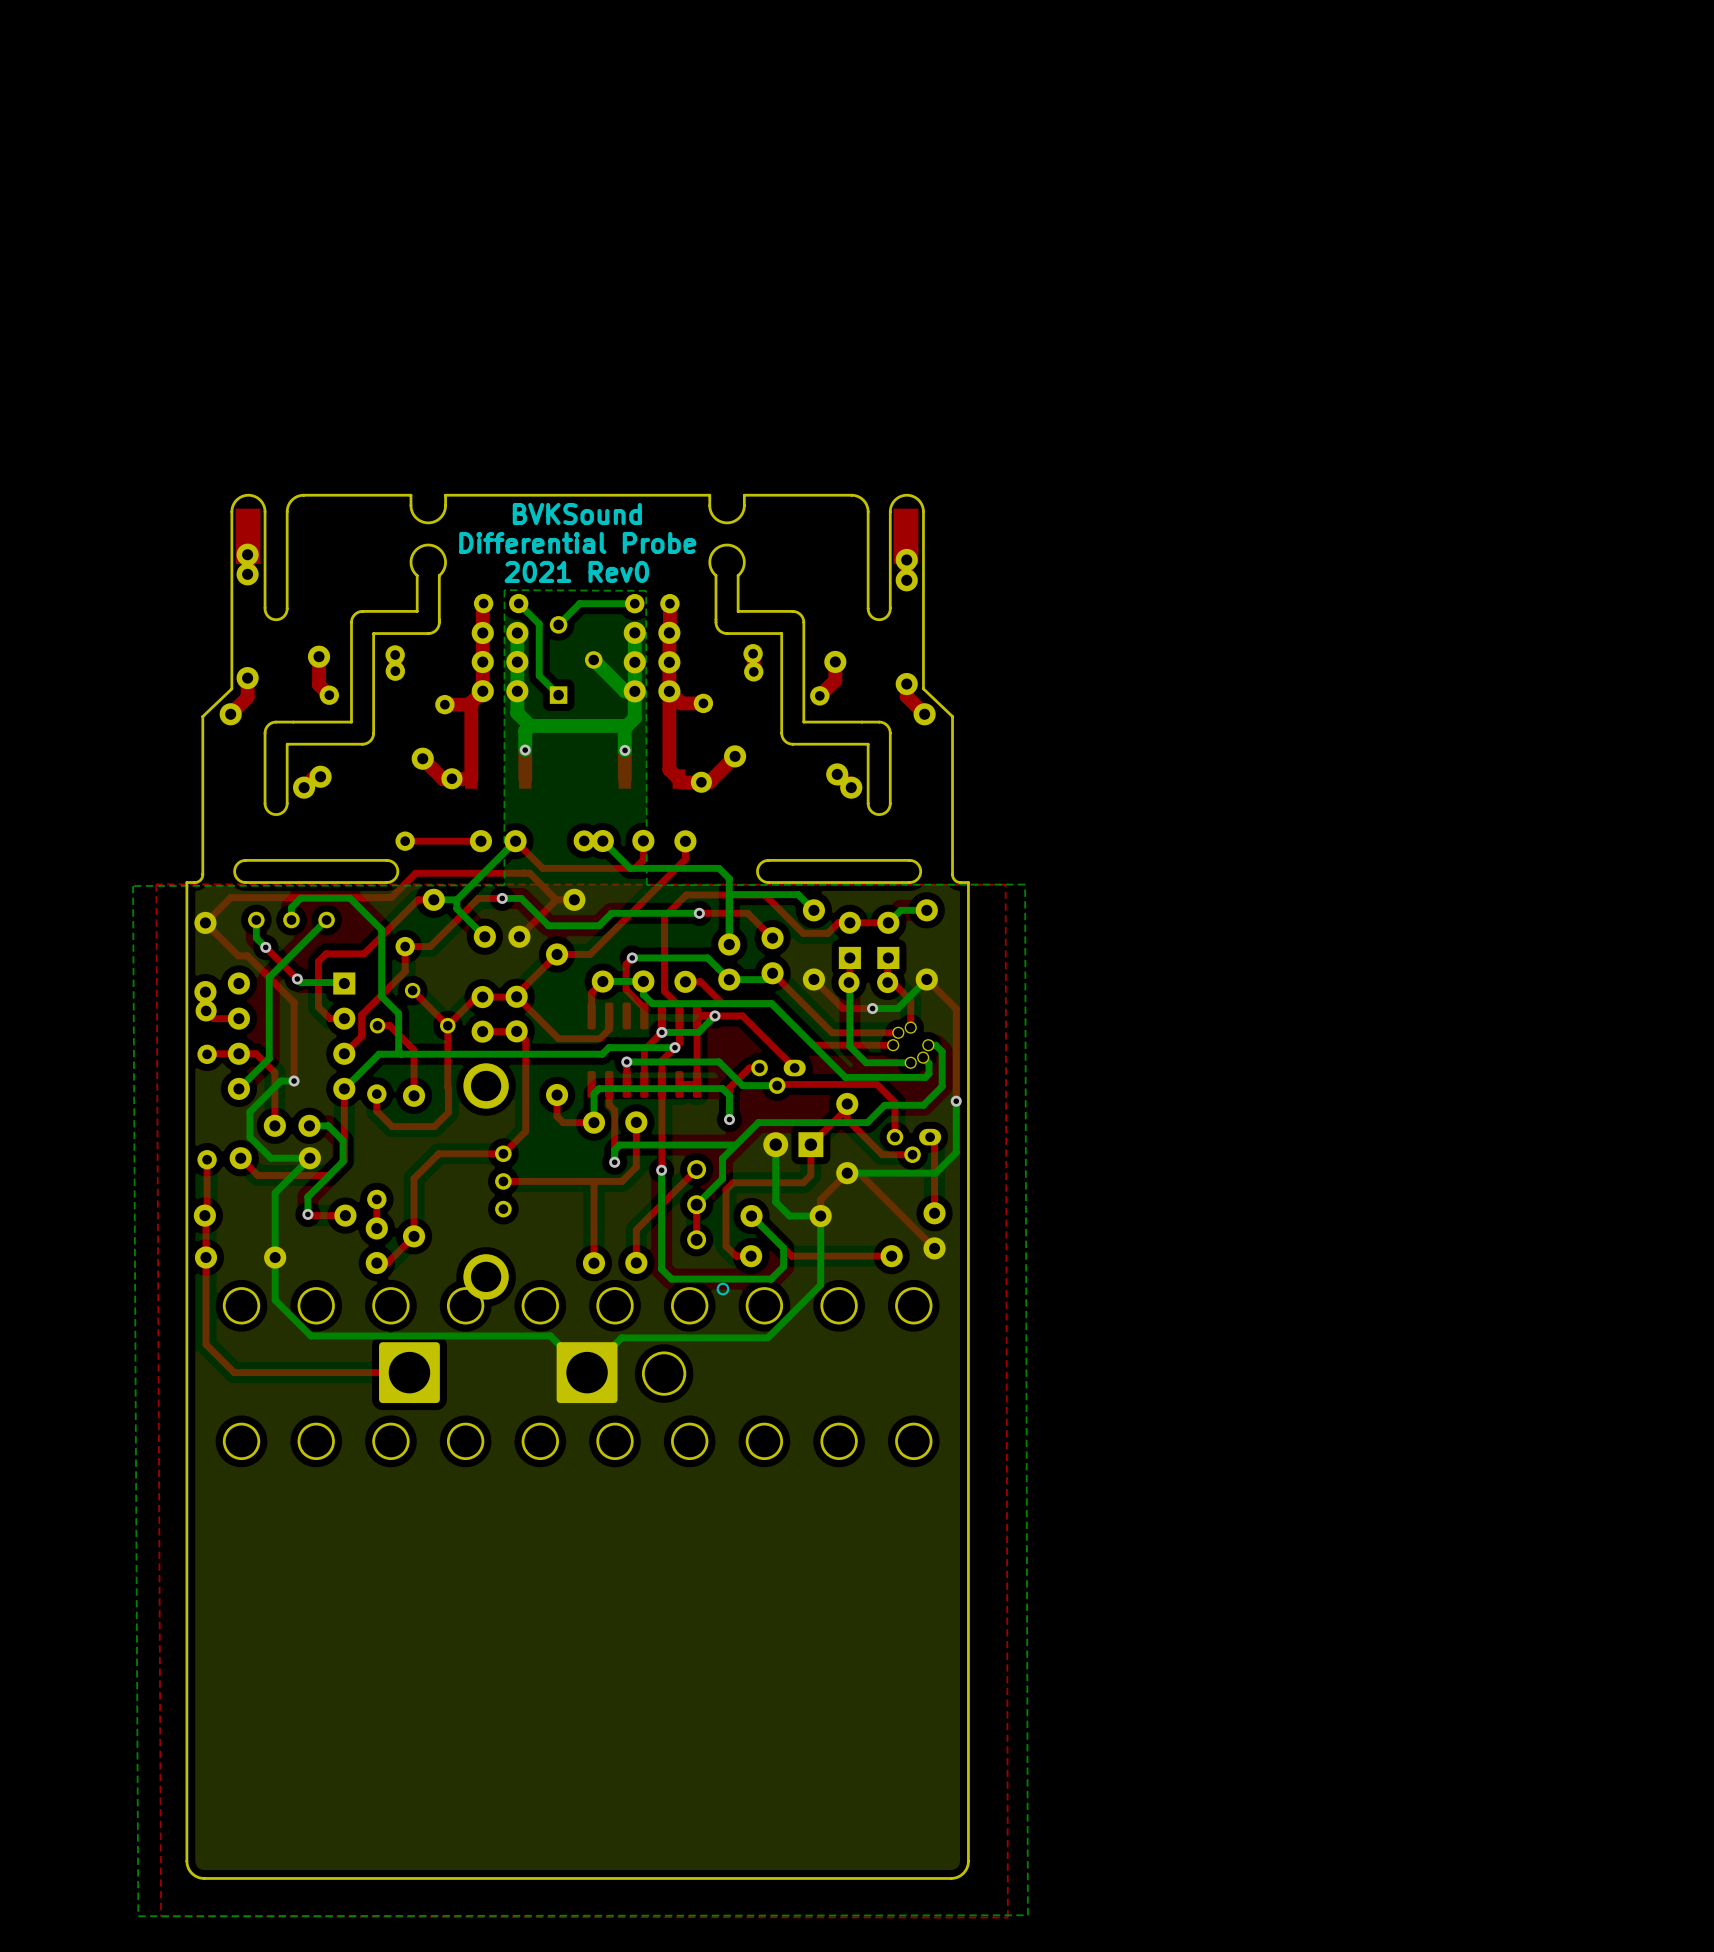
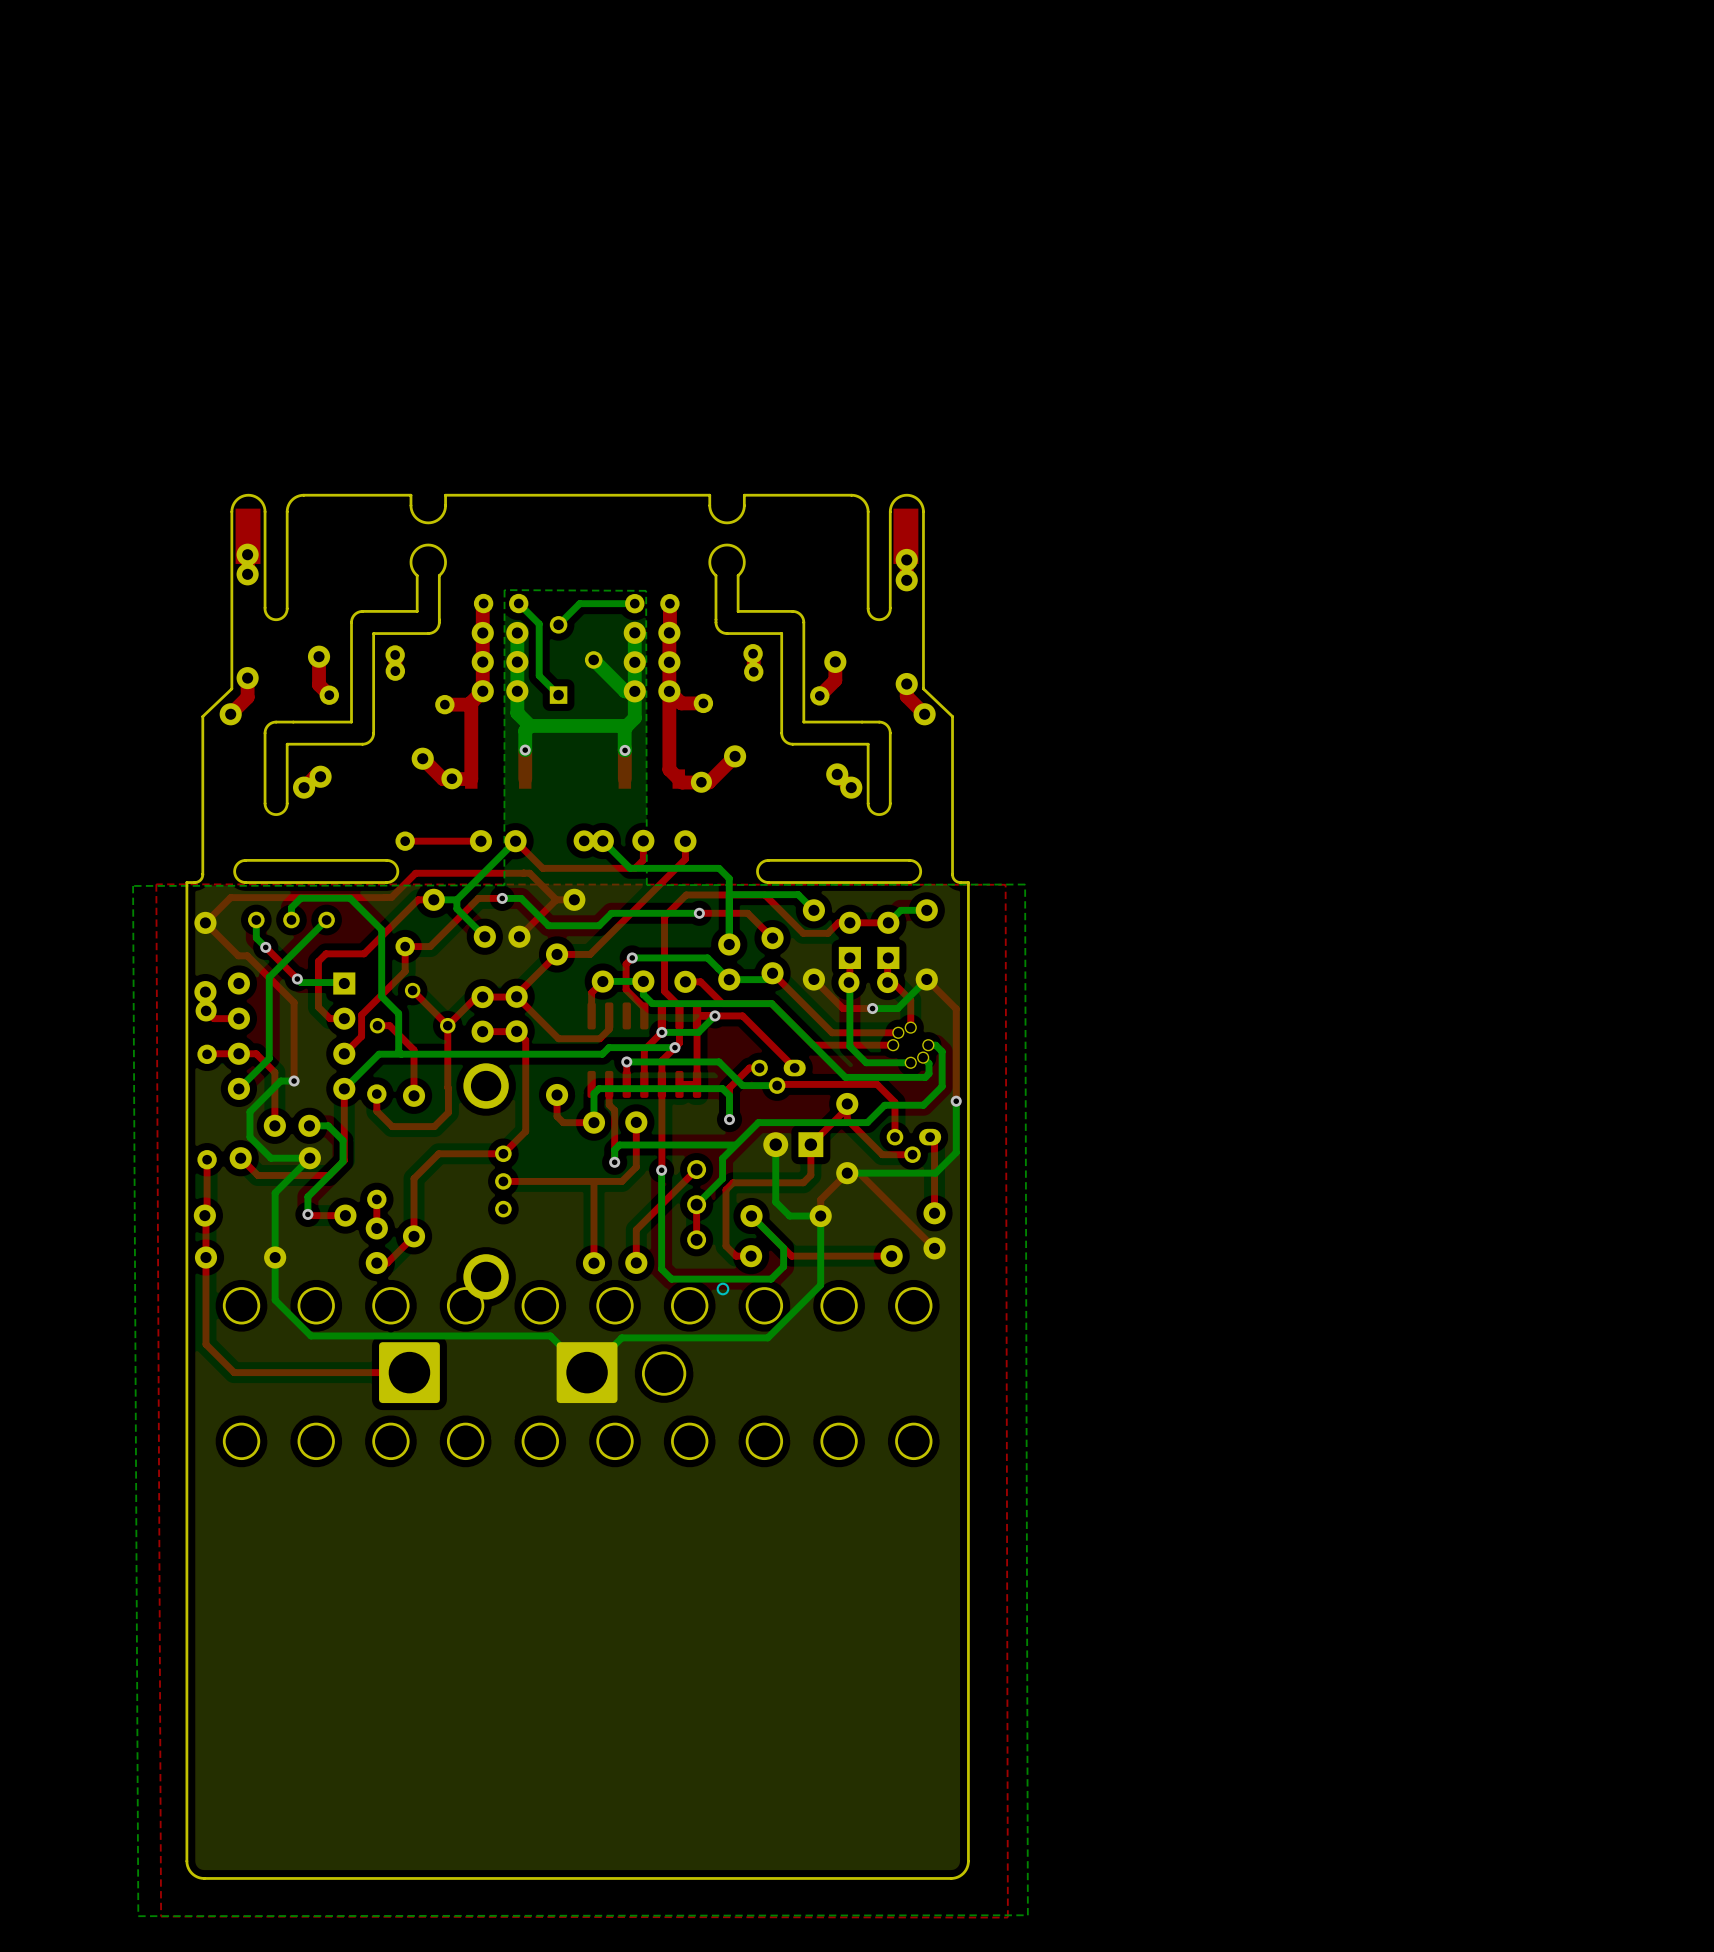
text: BVKSound (577, 514) -> none
text: Differential Probe (577, 542) -> none
text: 2021 Rev0 (576, 571) -> none

